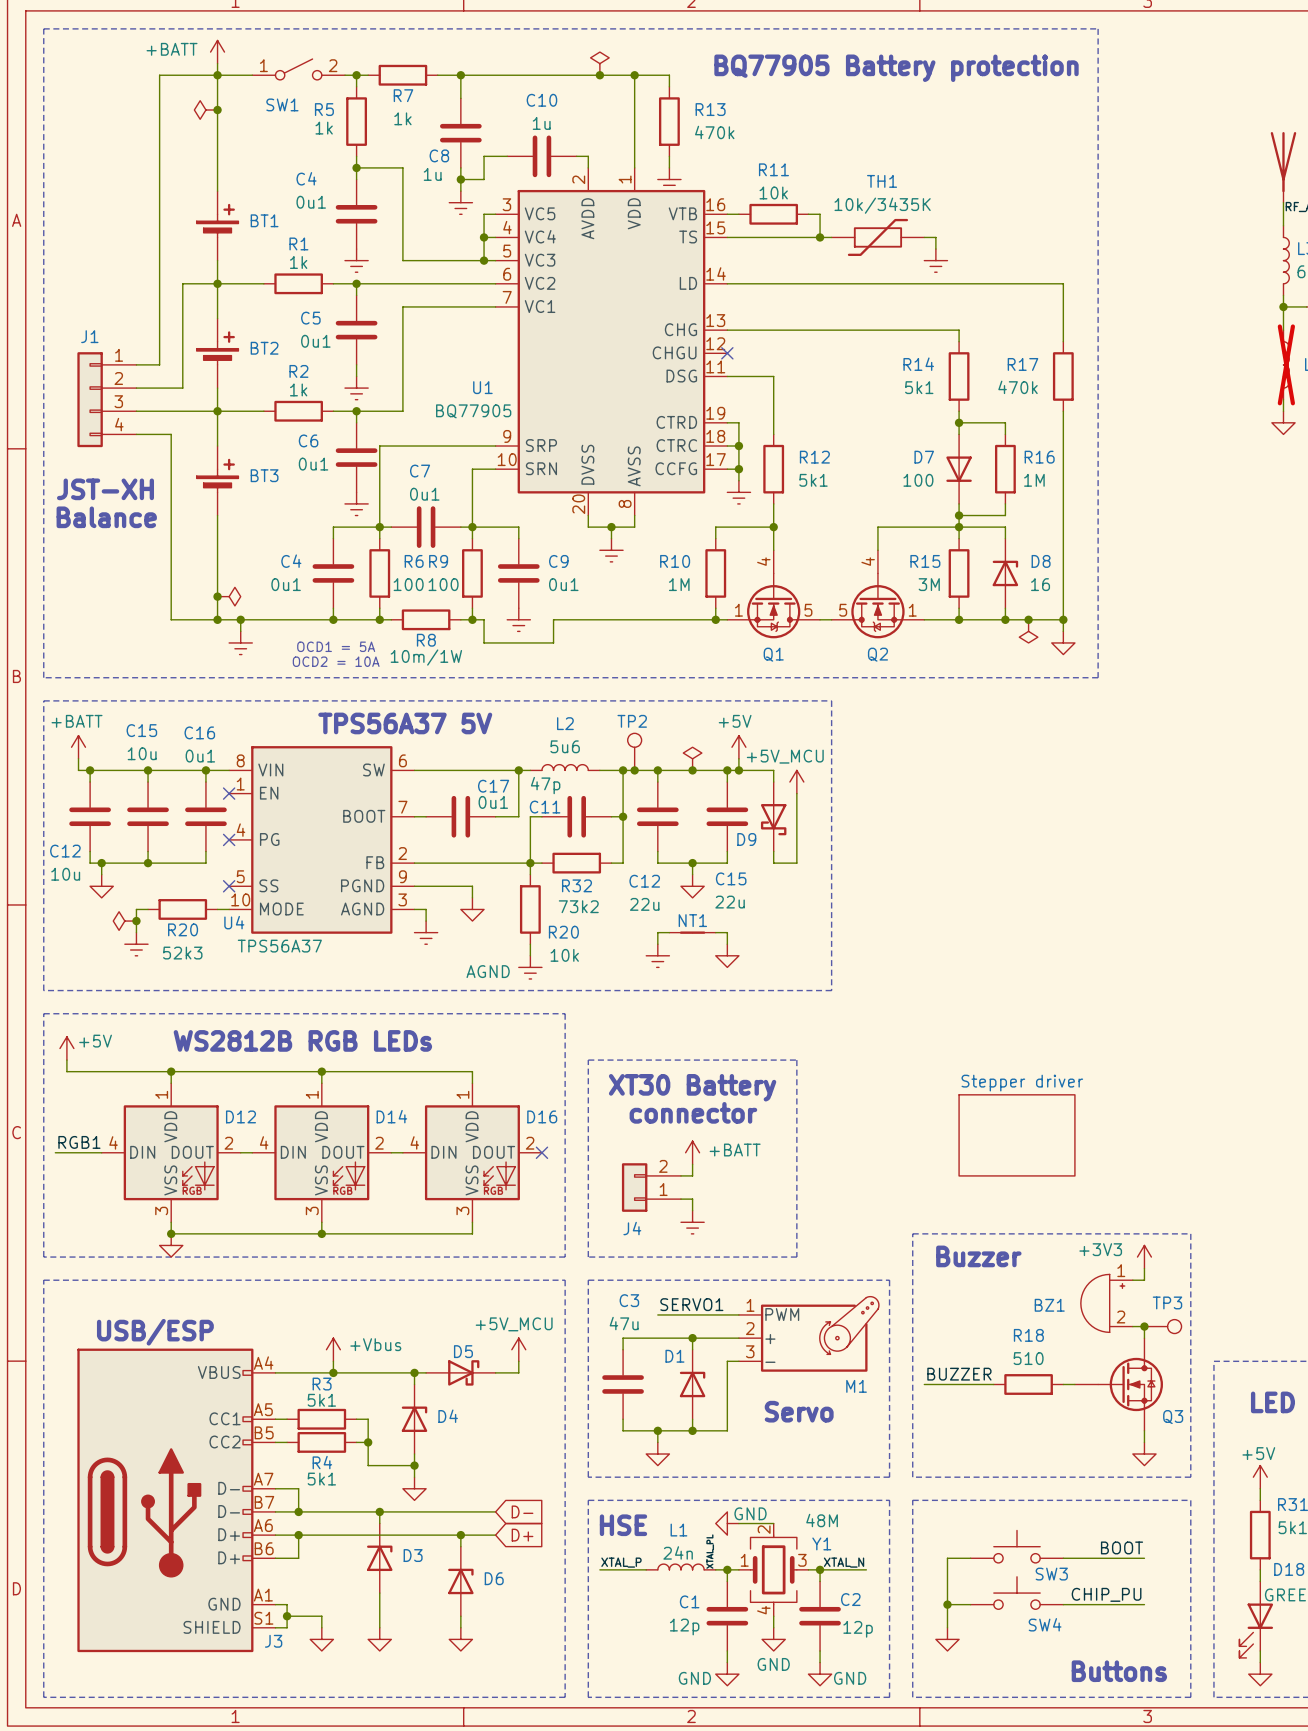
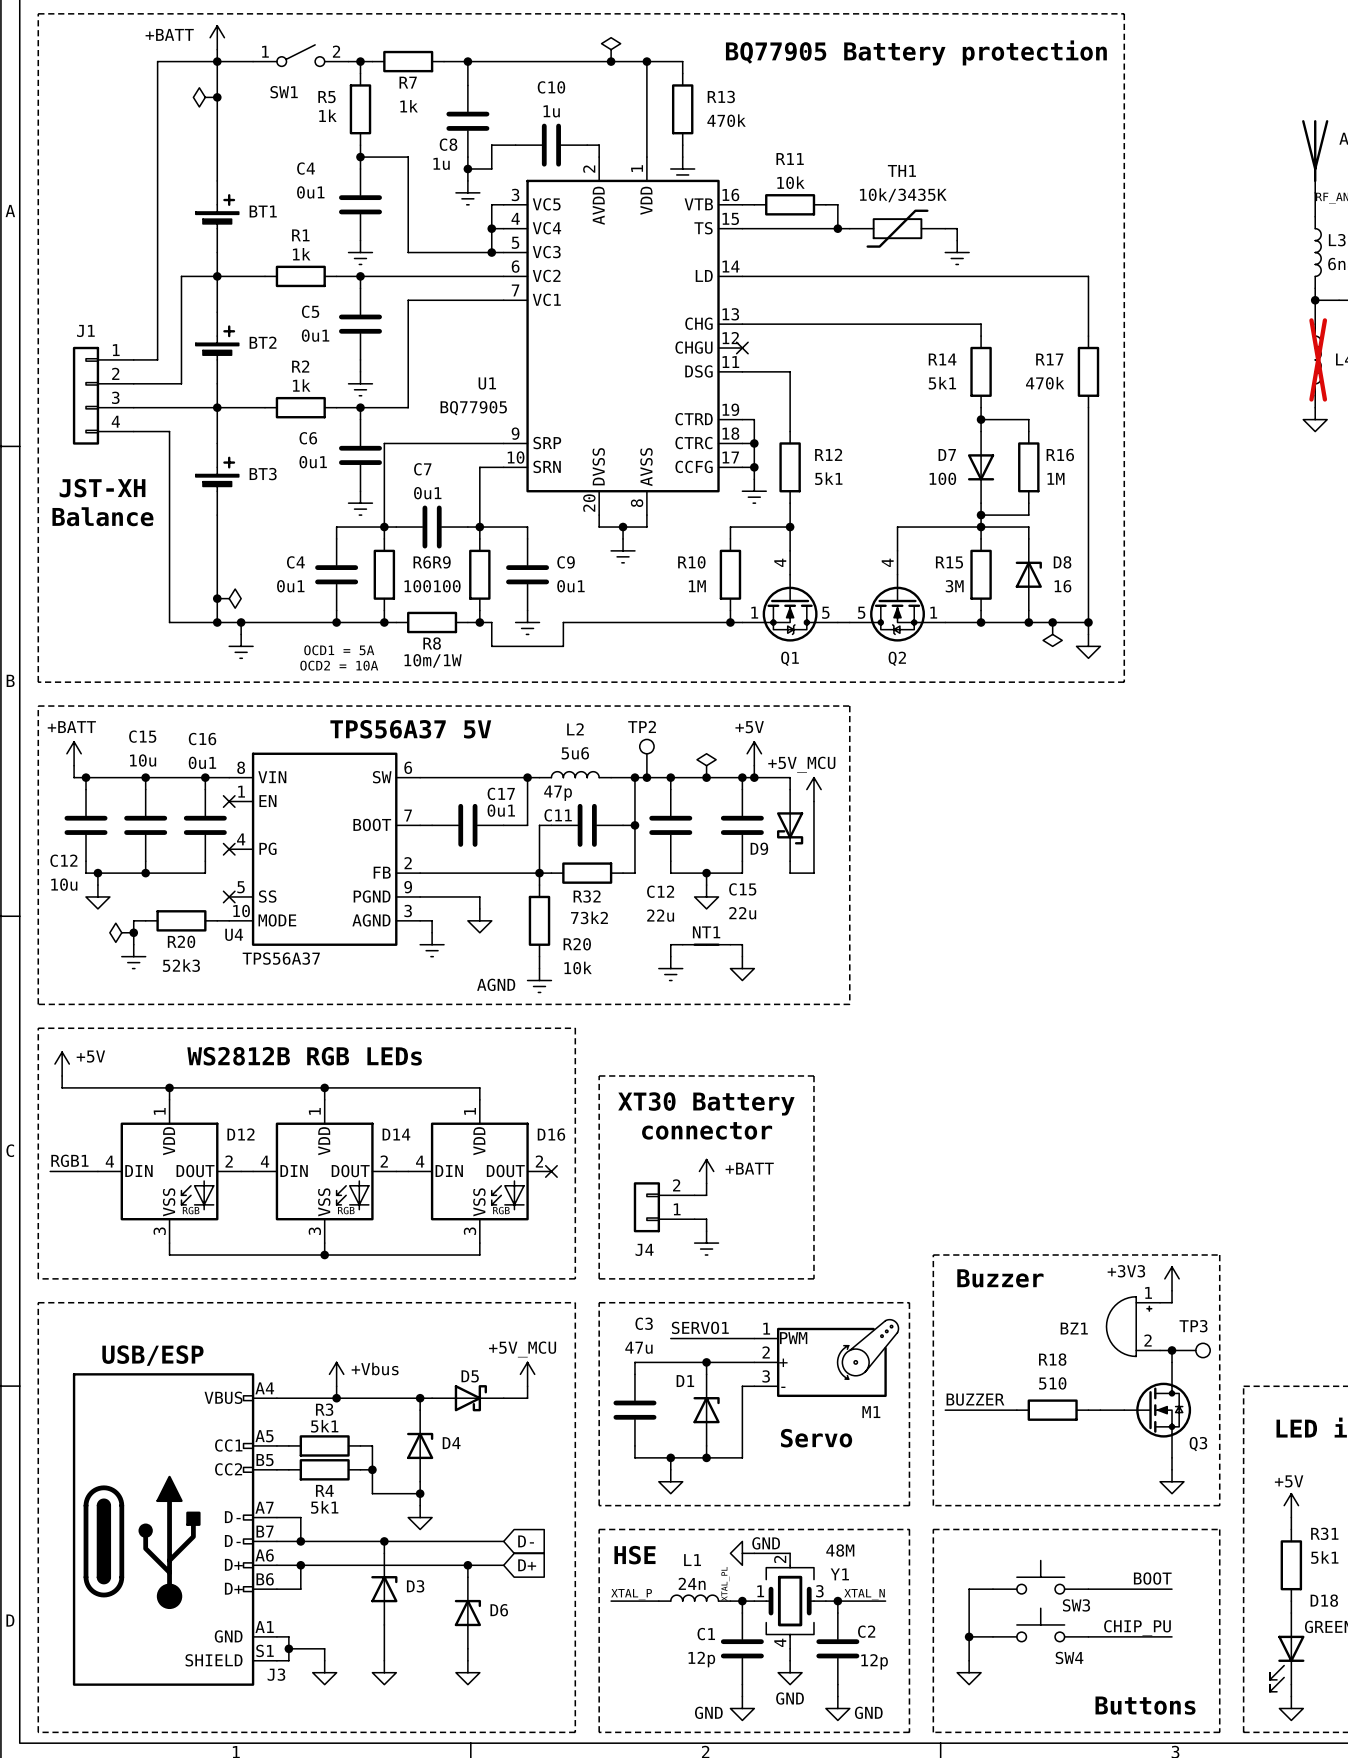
sheet Stepper driver: (1017, 1135) -> none
junction: (171, 1233) -> none
power symbol: (171, 1245) -> none

